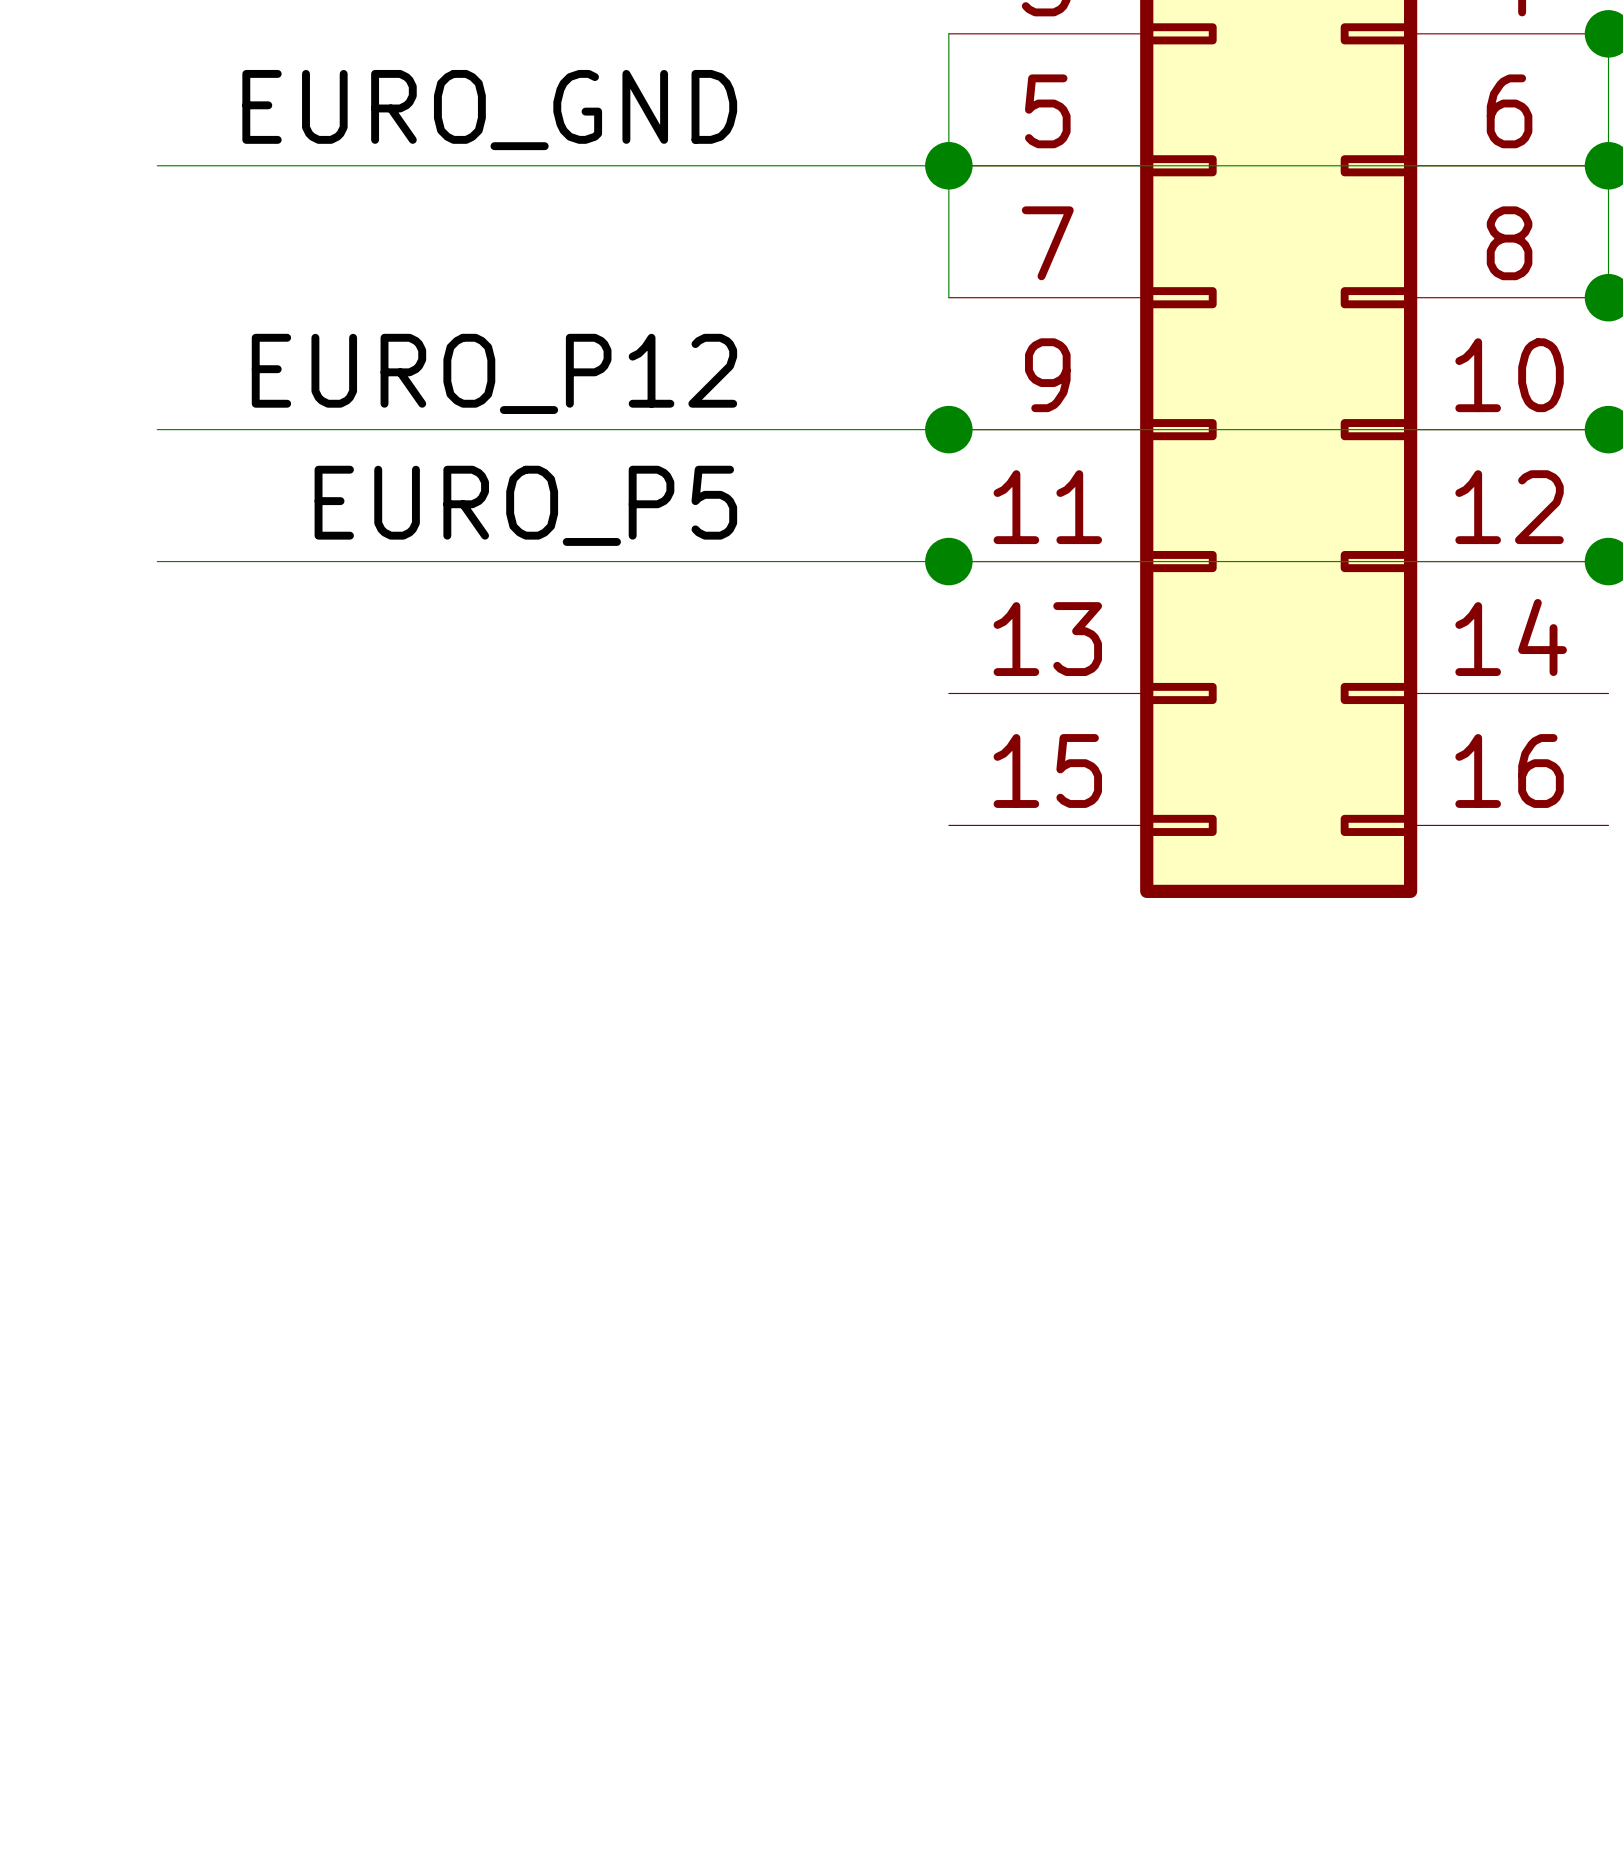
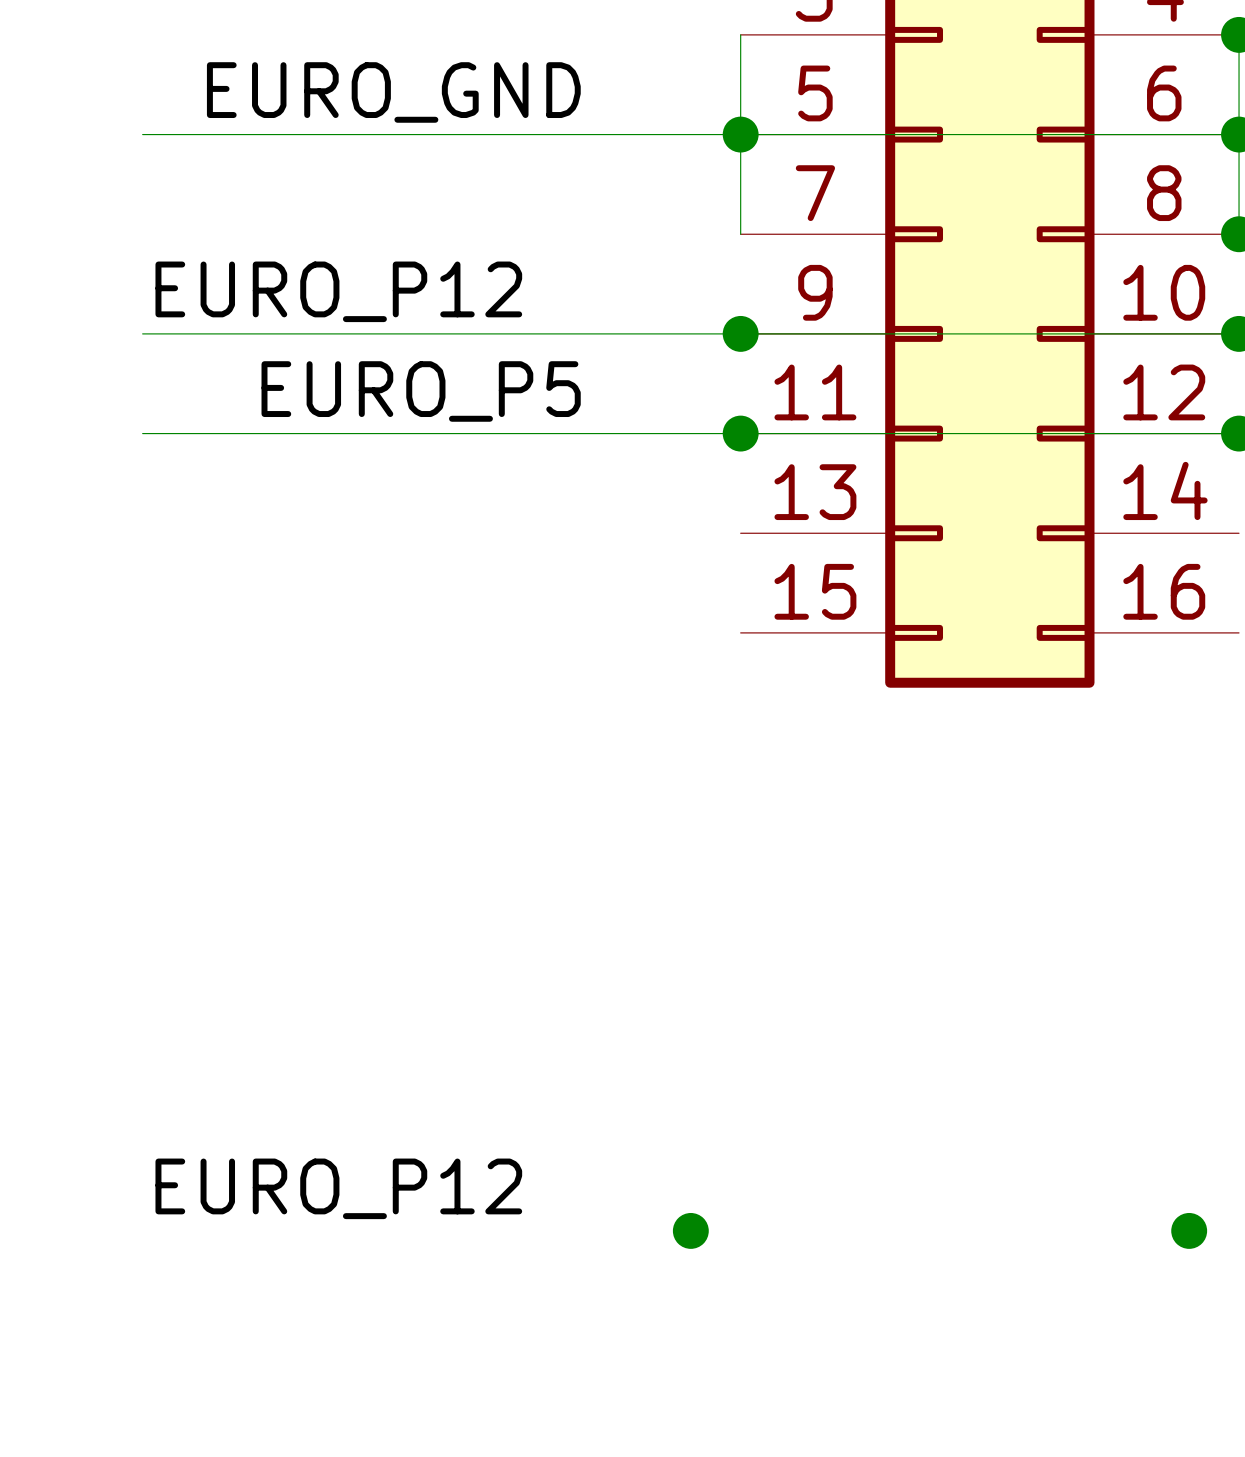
label position: EURO_P12 (494, 373) -> EURO_P12 (338, 291)
label: none -> EURO_P12 (338, 1188)
junction: none -> (690, 1230)
junction: none -> (1189, 1230)

